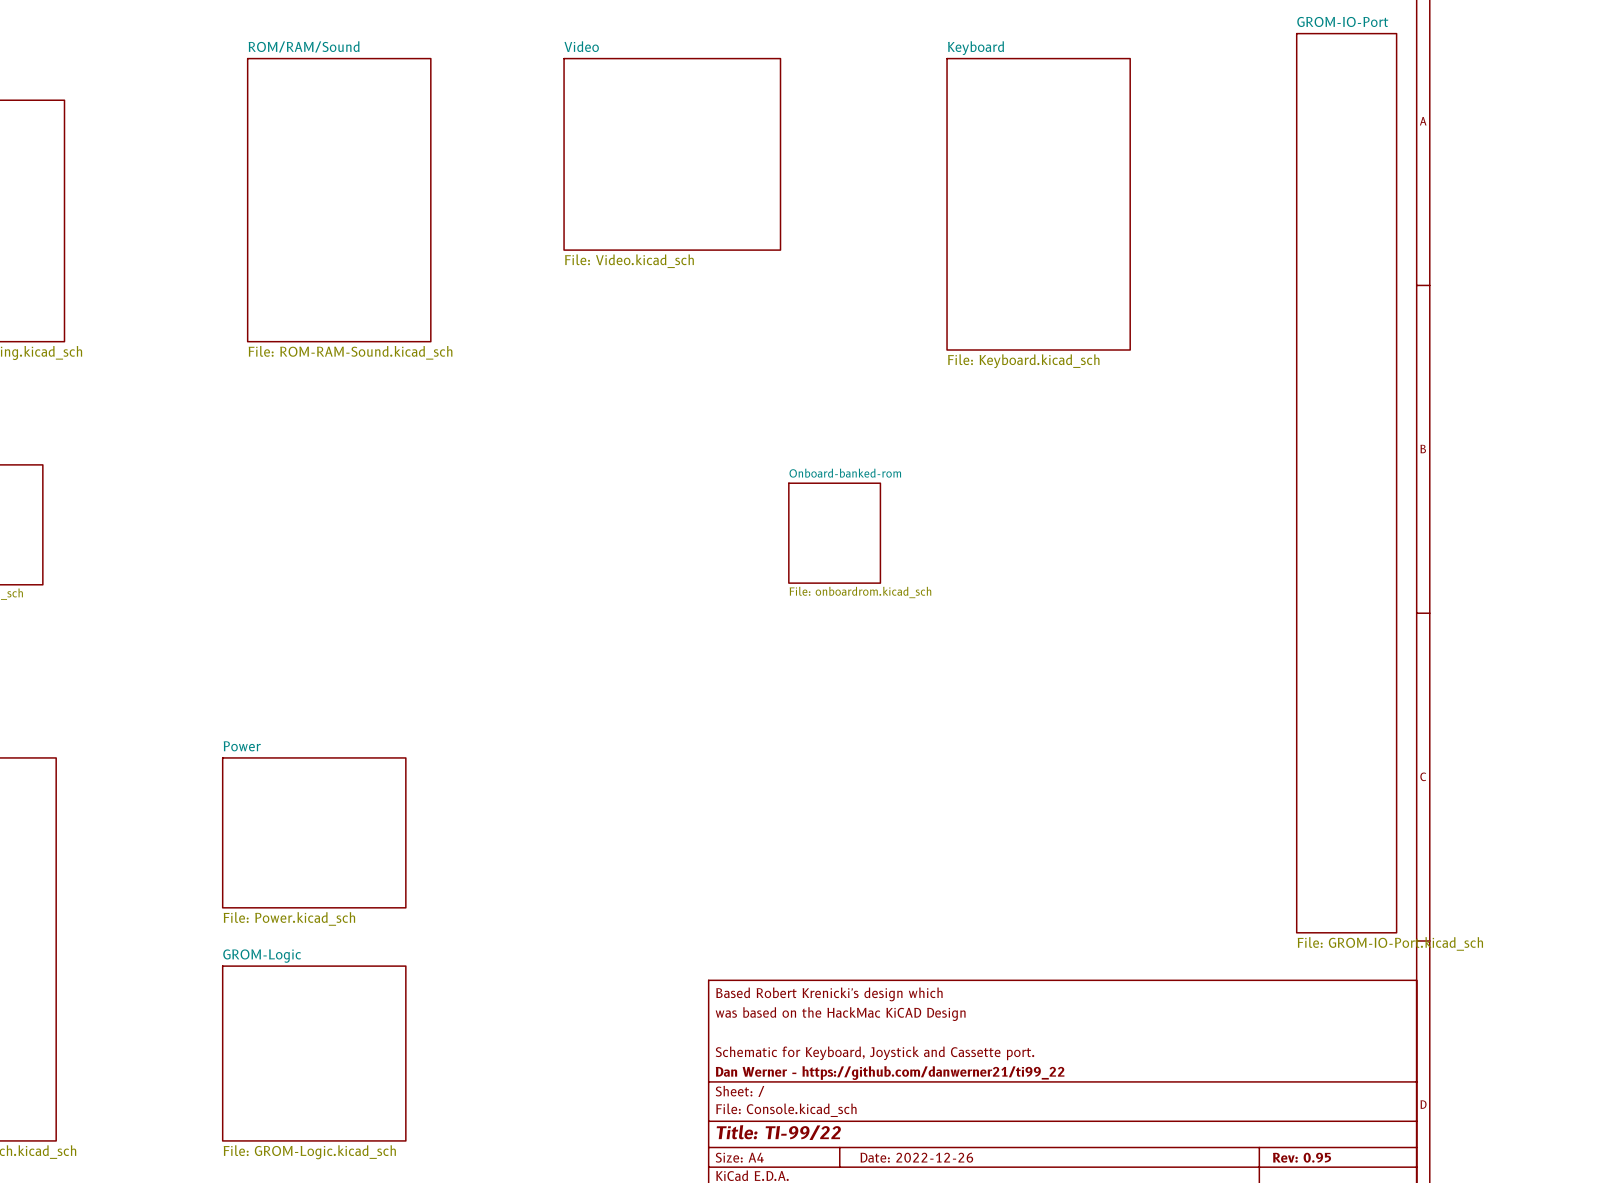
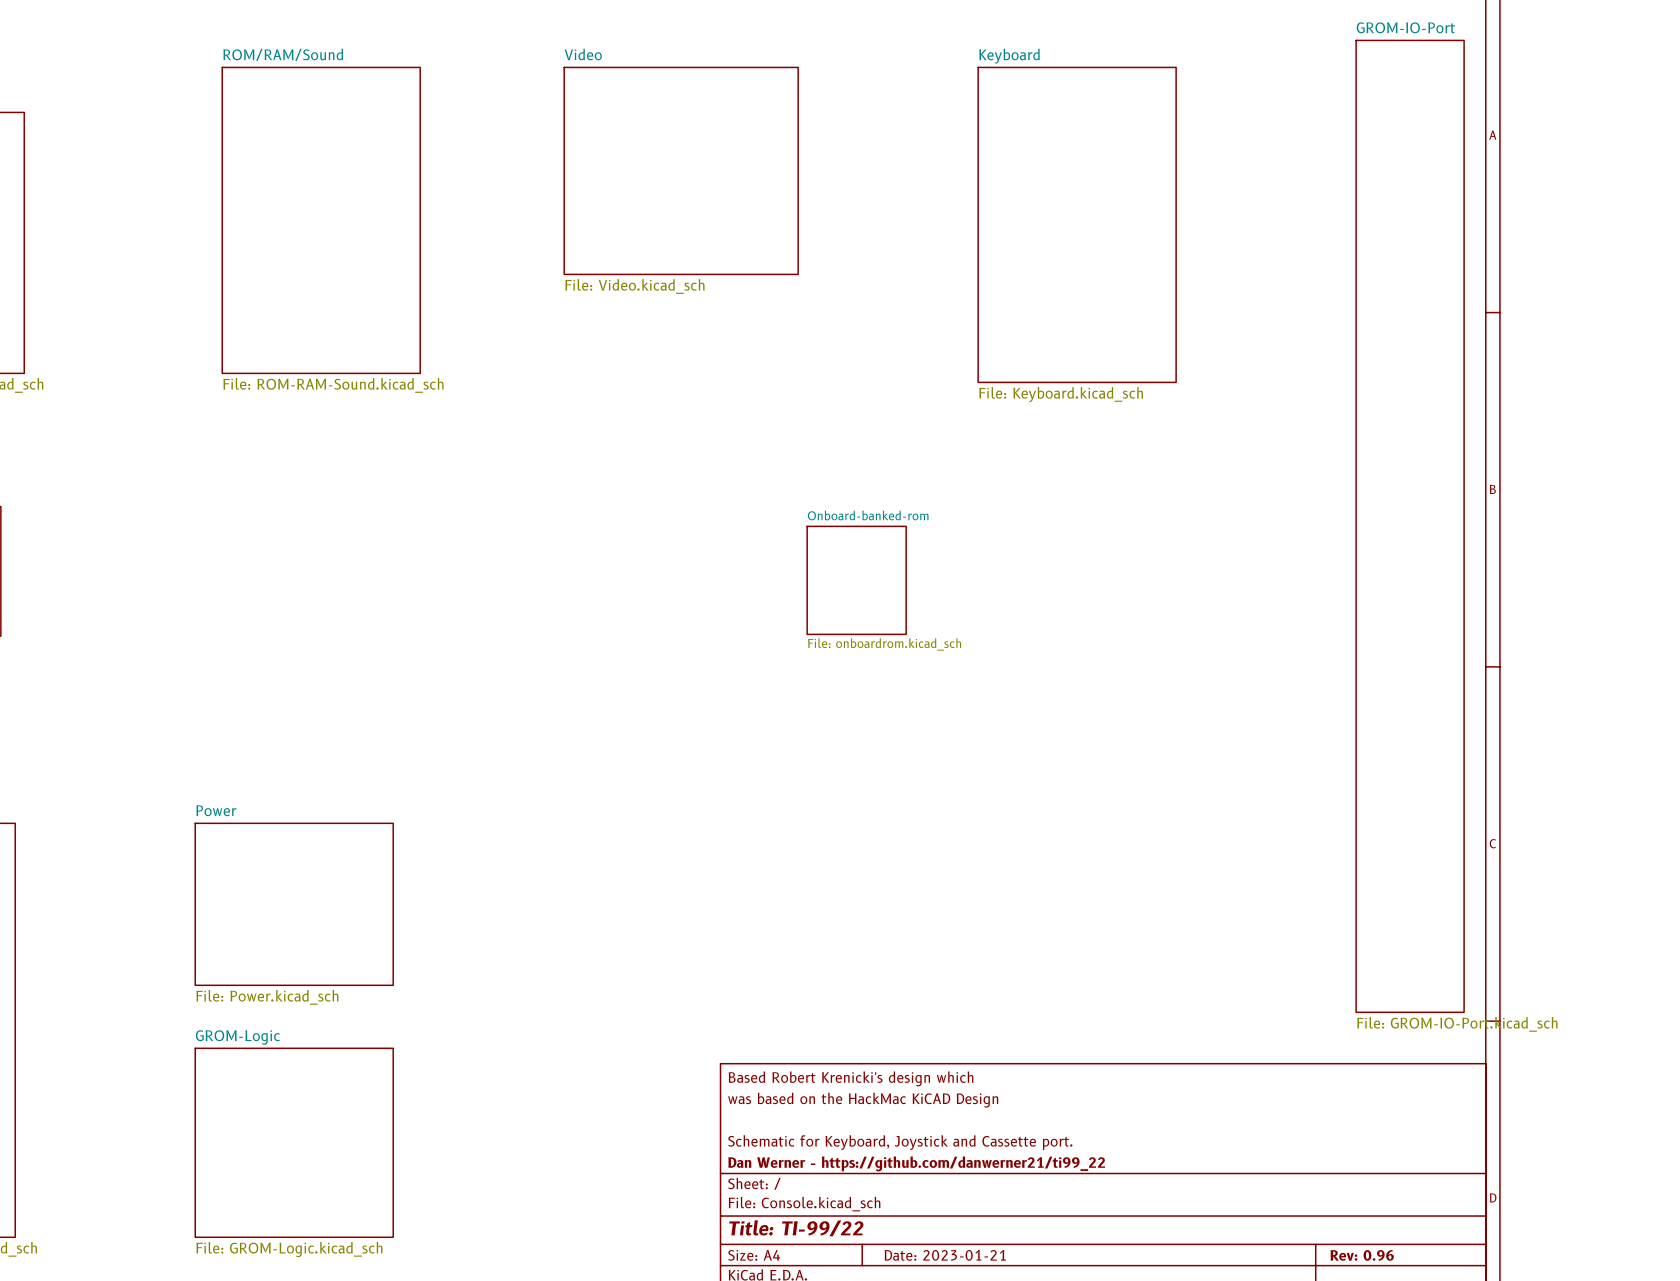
title block: Date: 2022-12-26 (916, 1157) -> Date: 2023-01-21 (945, 1255)
title block: Rev: 0.95 (1302, 1157) -> Rev: 0.96 (1362, 1255)

